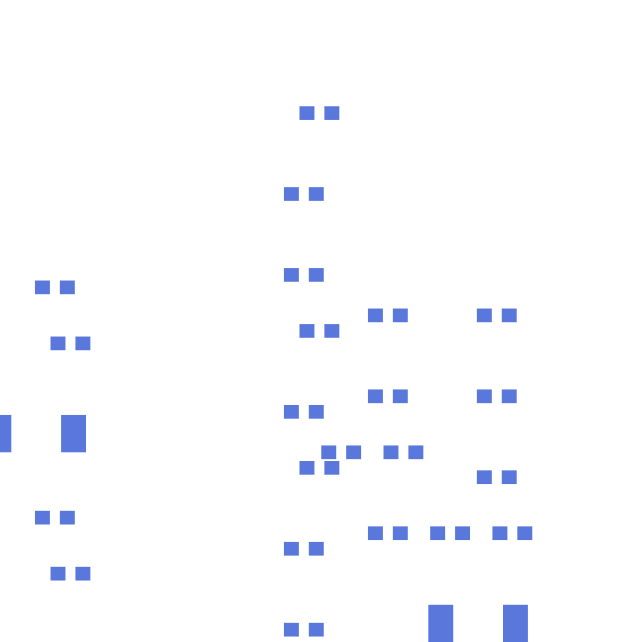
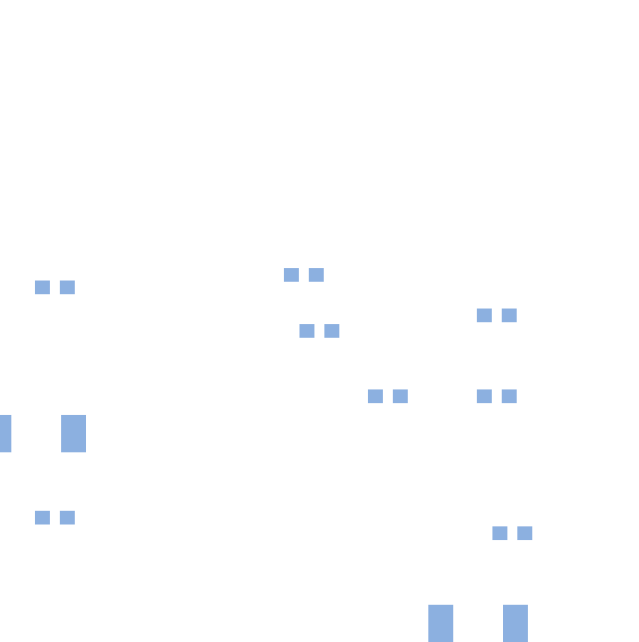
part: (319, 113) -> none
part: (303, 194) -> none
part: (387, 315) -> none
part: (70, 343) -> none
part: (303, 411) -> none
part: (341, 452) -> none
part: (403, 452) -> none
part: (319, 467) -> none
part: (496, 477) -> none
part: (387, 533) -> none
part: (450, 533) -> none
part: (303, 548) -> none
part: (70, 573) -> none
part: (303, 629) -> none

